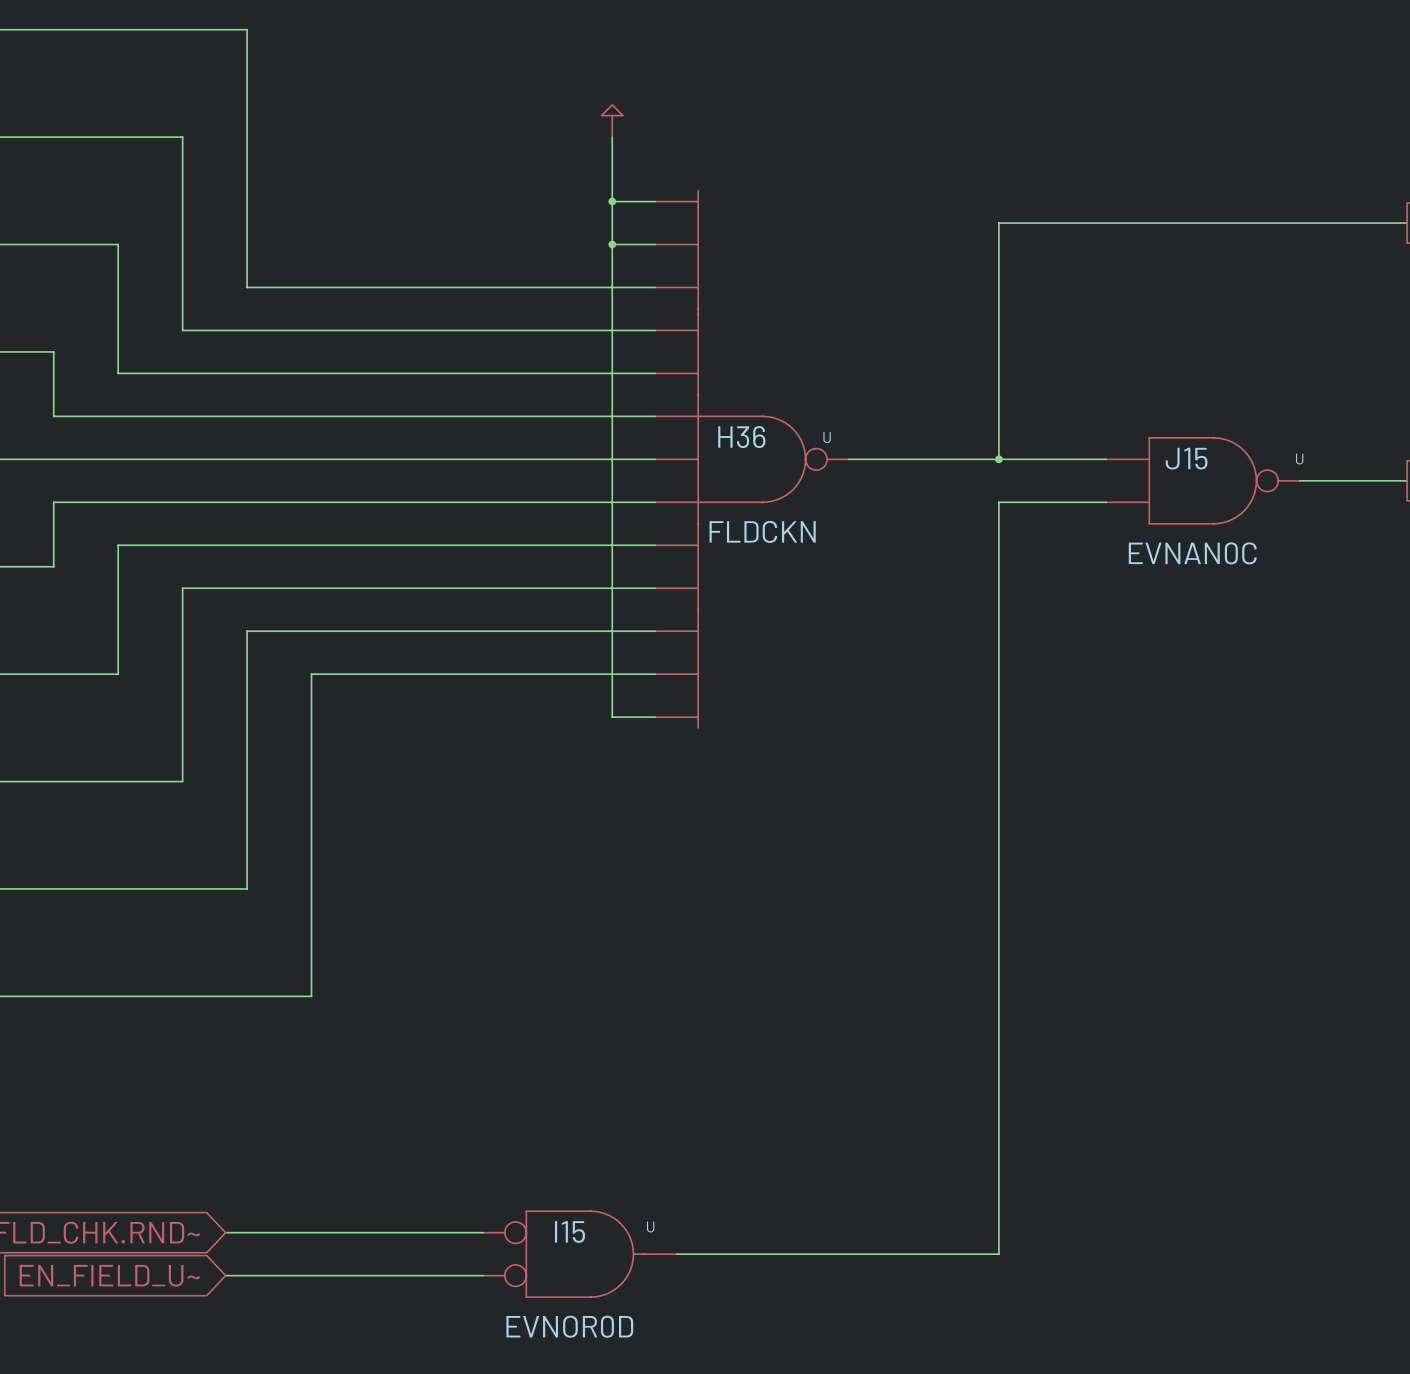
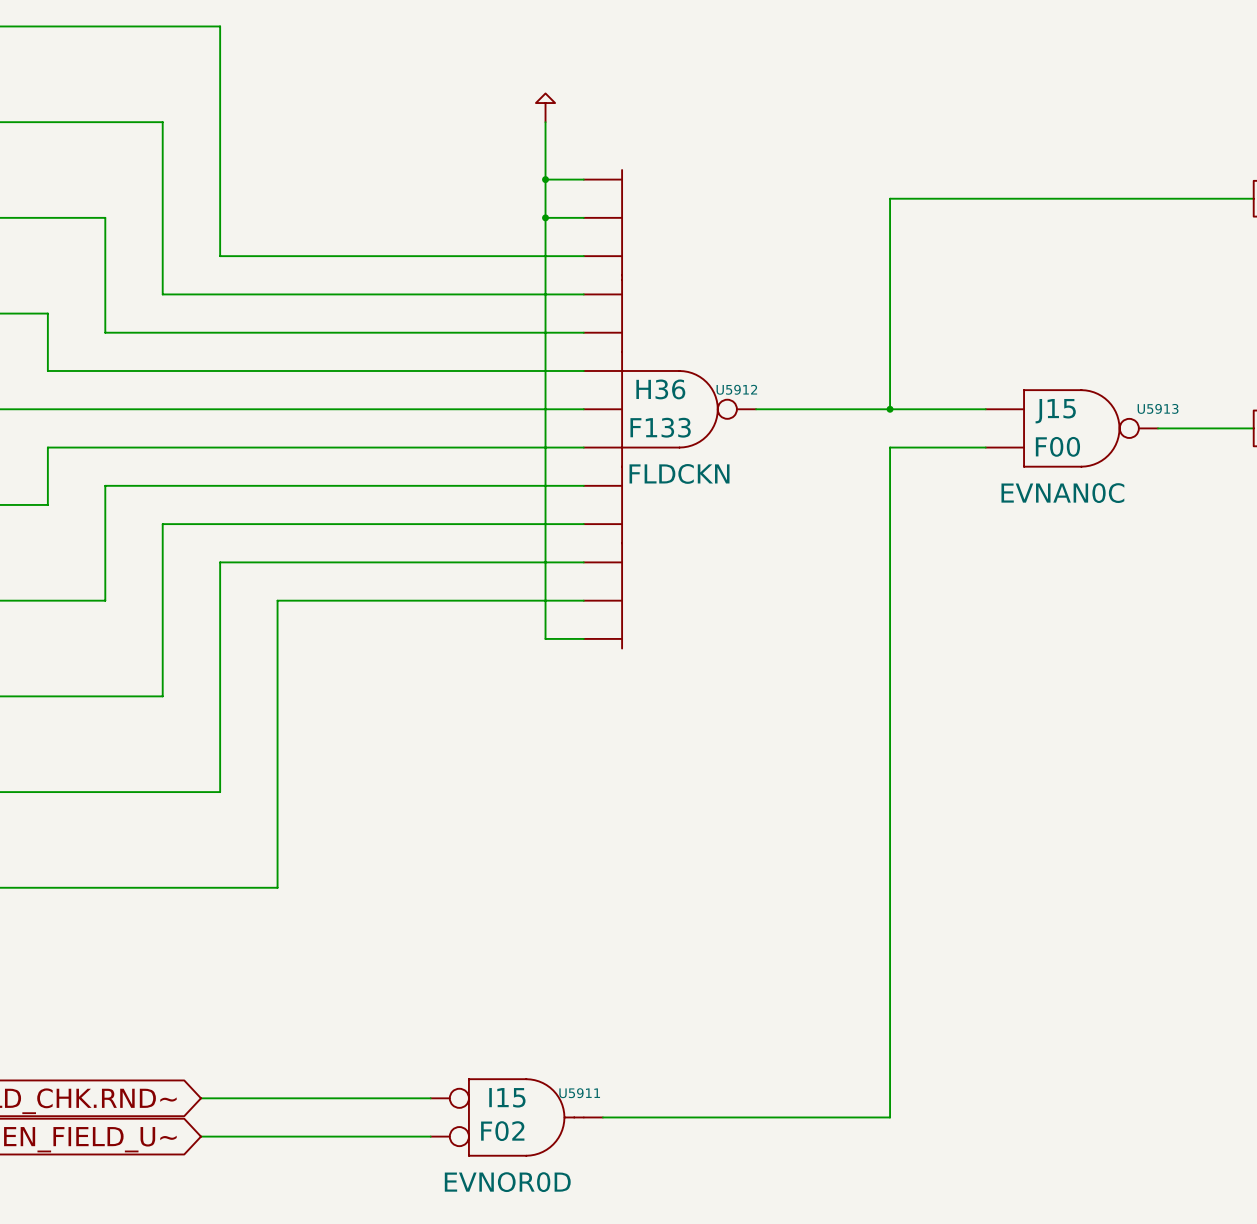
U name: U (827, 437) -> U5912 (736, 389)
U name: U (1299, 459) -> U5913 (1158, 408)
U value: none -> F133 (660, 427)
U value: none -> F00 (1057, 446)
U name: U (650, 1226) -> U5911 (579, 1093)
U value: none -> F02 (502, 1131)

